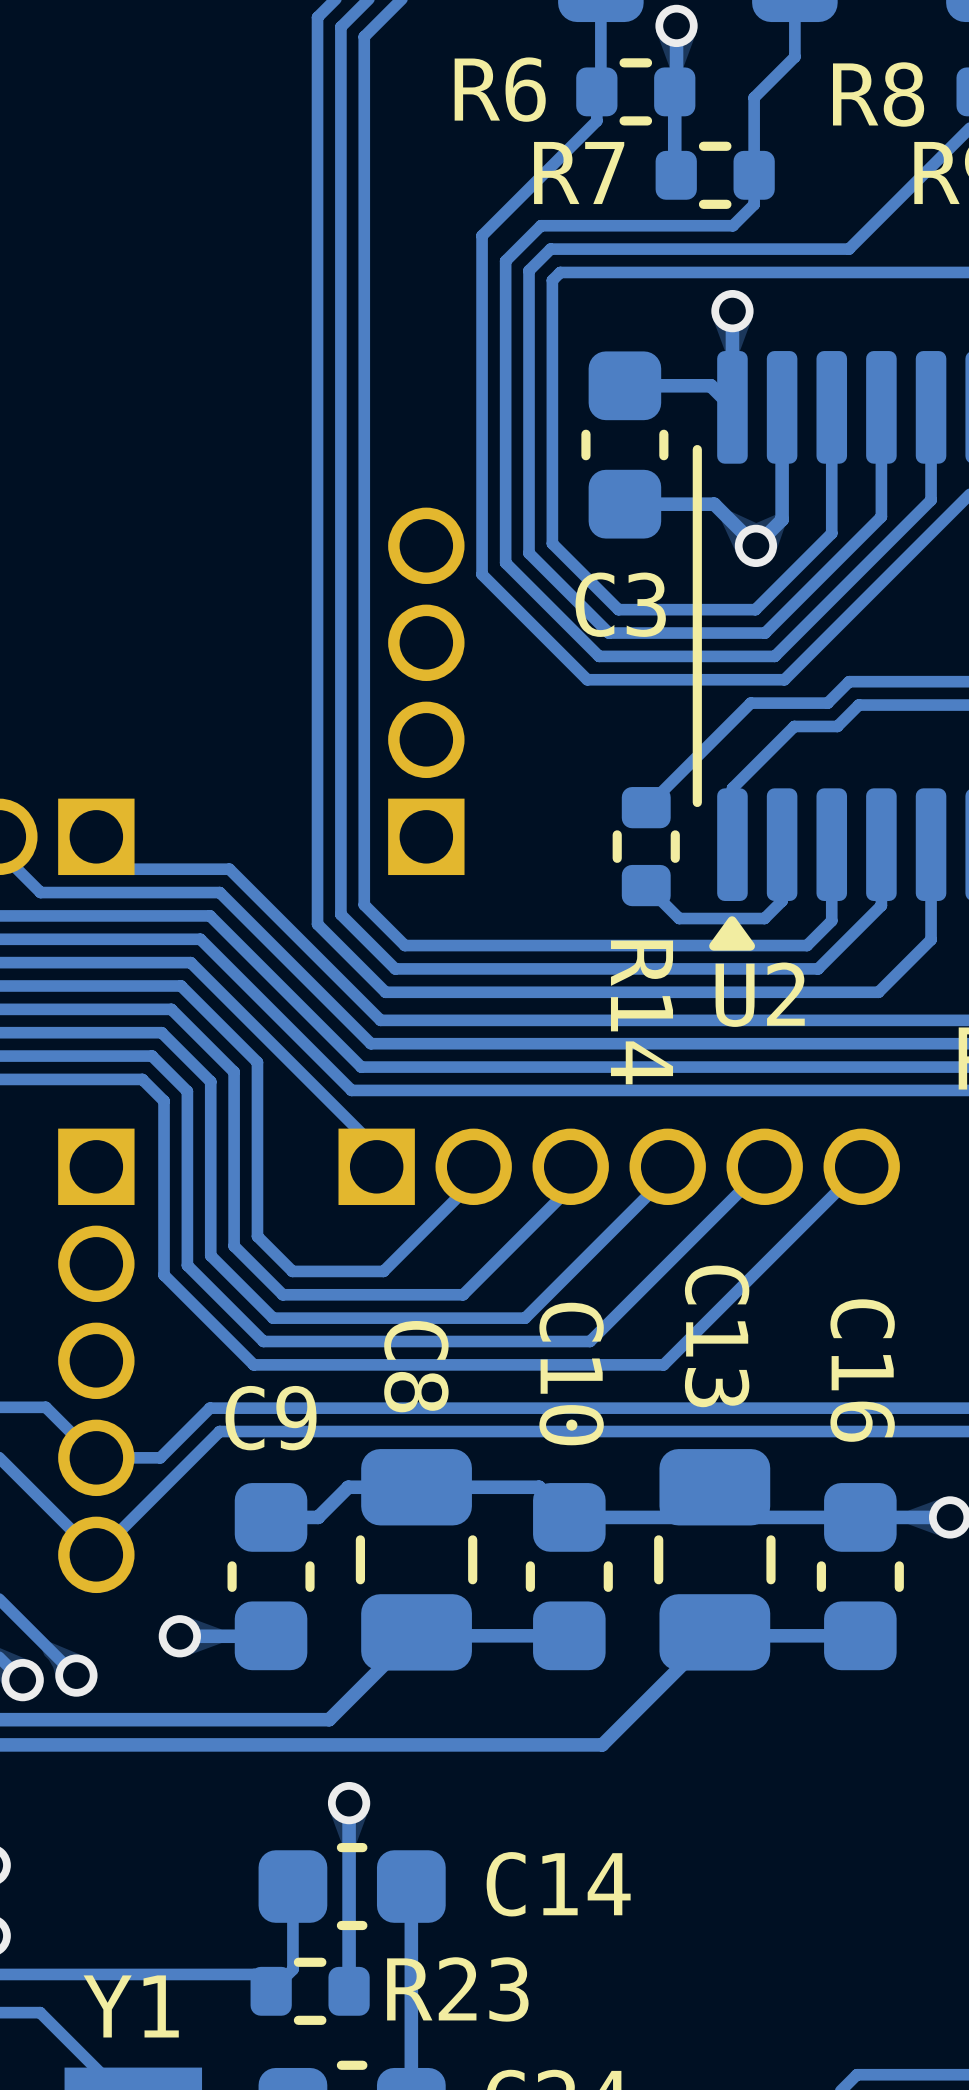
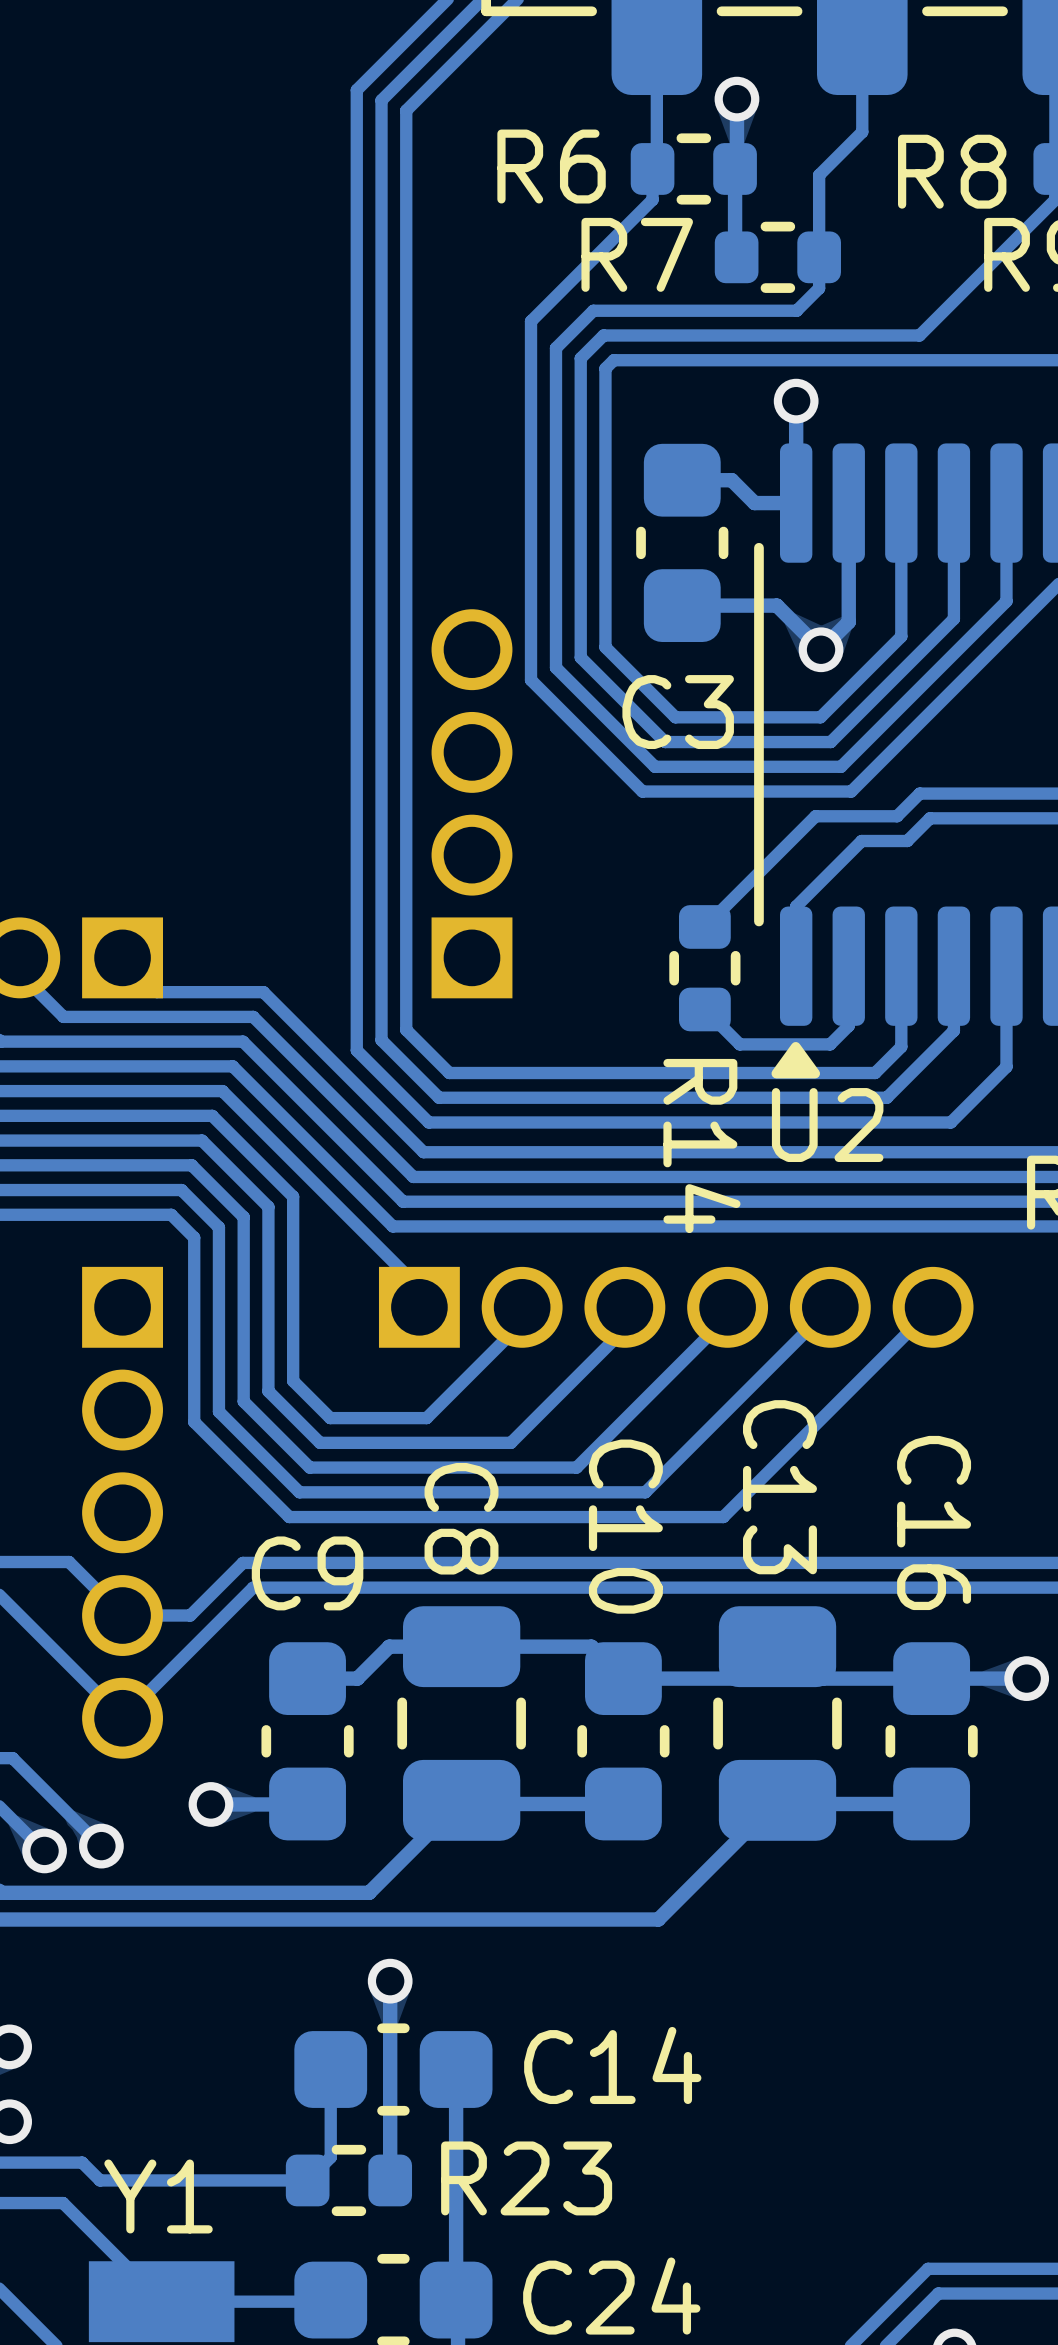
track: (671, 385) (710, 385) (732, 407) -> (731, 480) (754, 503) (796, 503)
track: (58, 1974) (254, 1974) (271, 1991) -> (82, 2162) (100, 2180) (307, 2180)

